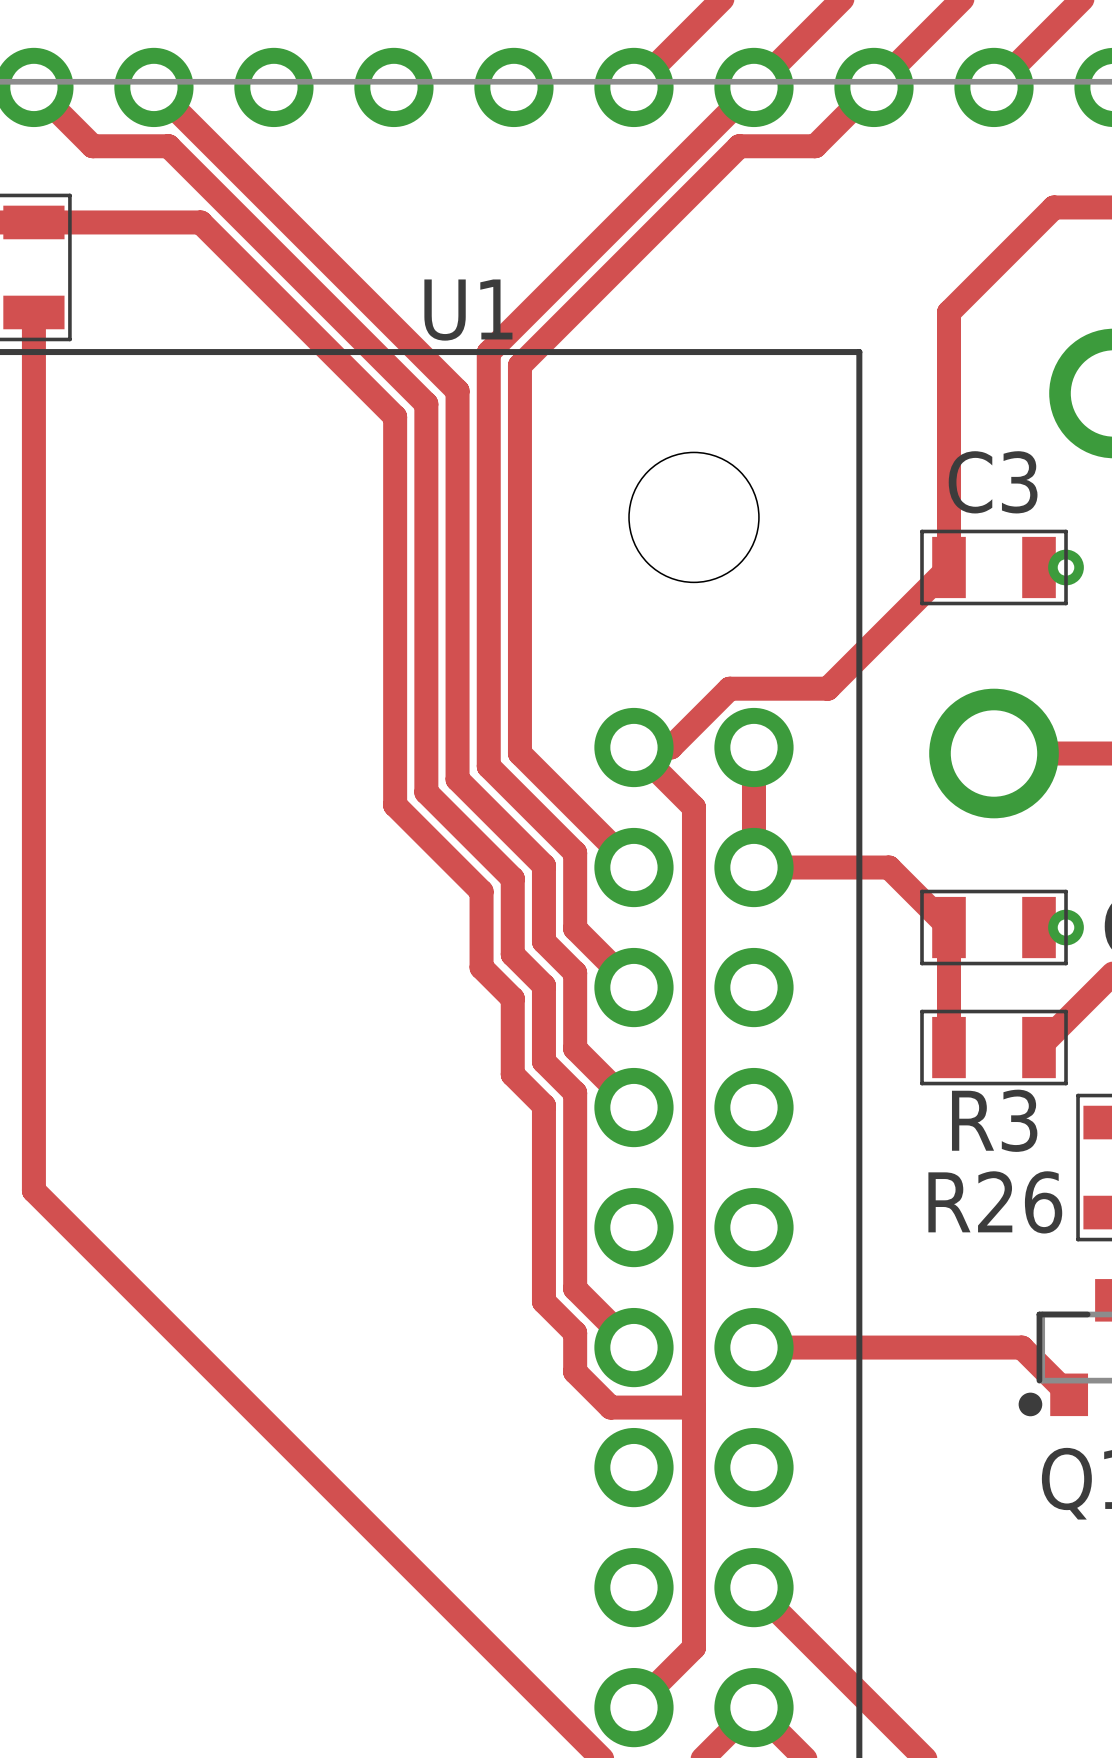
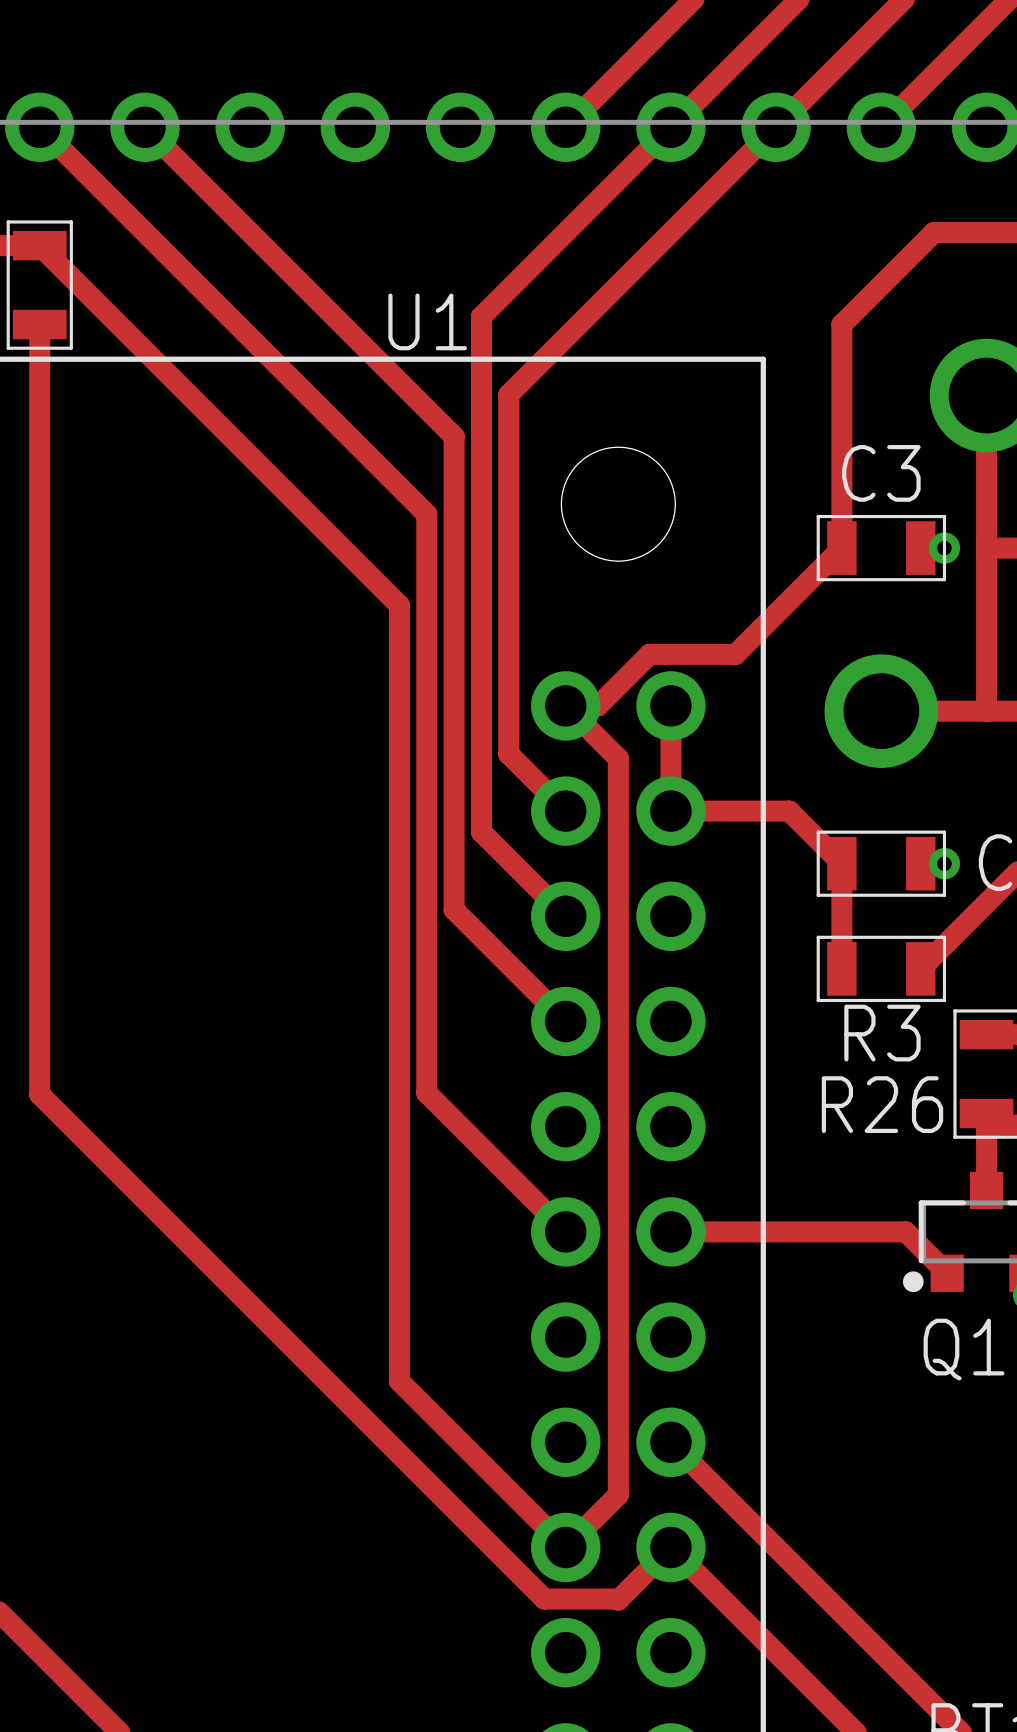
track: (92, 146) (168, 146) (426, 404) (426, 792) (512, 878) (512, 954) (543, 985) (543, 1061) (575, 1092) (575, 1288) -> (91, 178) (426, 514) (426, 1092) (514, 1180)
track: (815, 146) (739, 146) (519, 365) (519, 753) (569, 802) -> (724, 178) (508, 394) (508, 754)
track: (33, 222) (200, 222) (395, 416) (395, 805) (481, 891) (481, 967) (512, 998) (512, 1074) (543, 1105) (543, 1301) (575, 1332) (575, 1371) (610, 1407) (693, 1407) -> (39, 245) (399, 605) (399, 1381) (565, 1547)
track: (537, 303) (488, 352) (488, 766) (575, 852) (575, 928) -> (481, 316) (481, 831) (514, 864)
track: (457, 391) (457, 779) (543, 865) (543, 941) (575, 972) (575, 1048) -> (411, 393) (454, 436) (454, 909) (514, 969)

